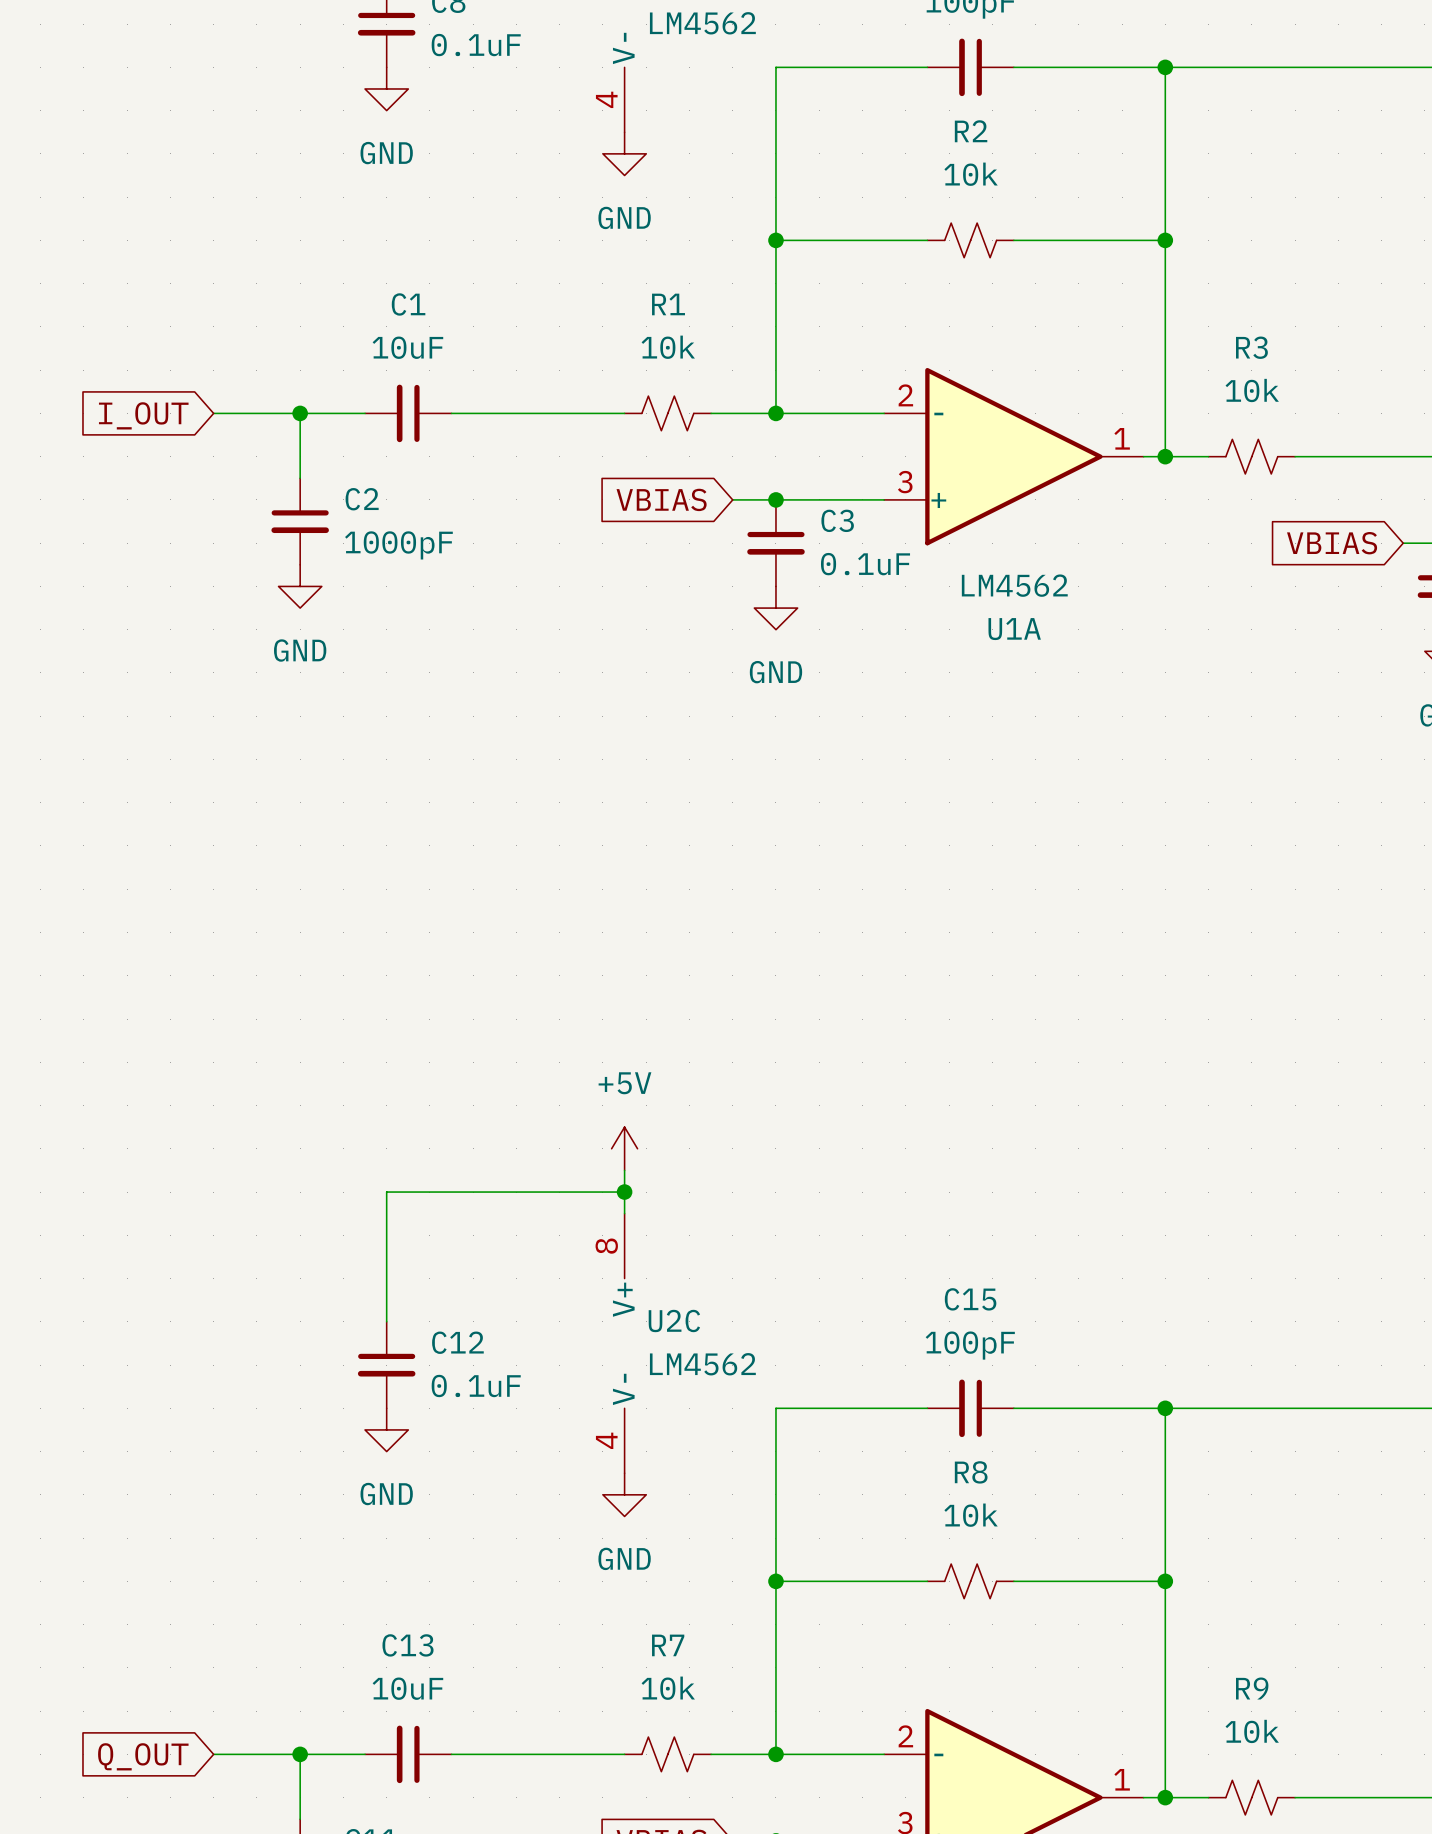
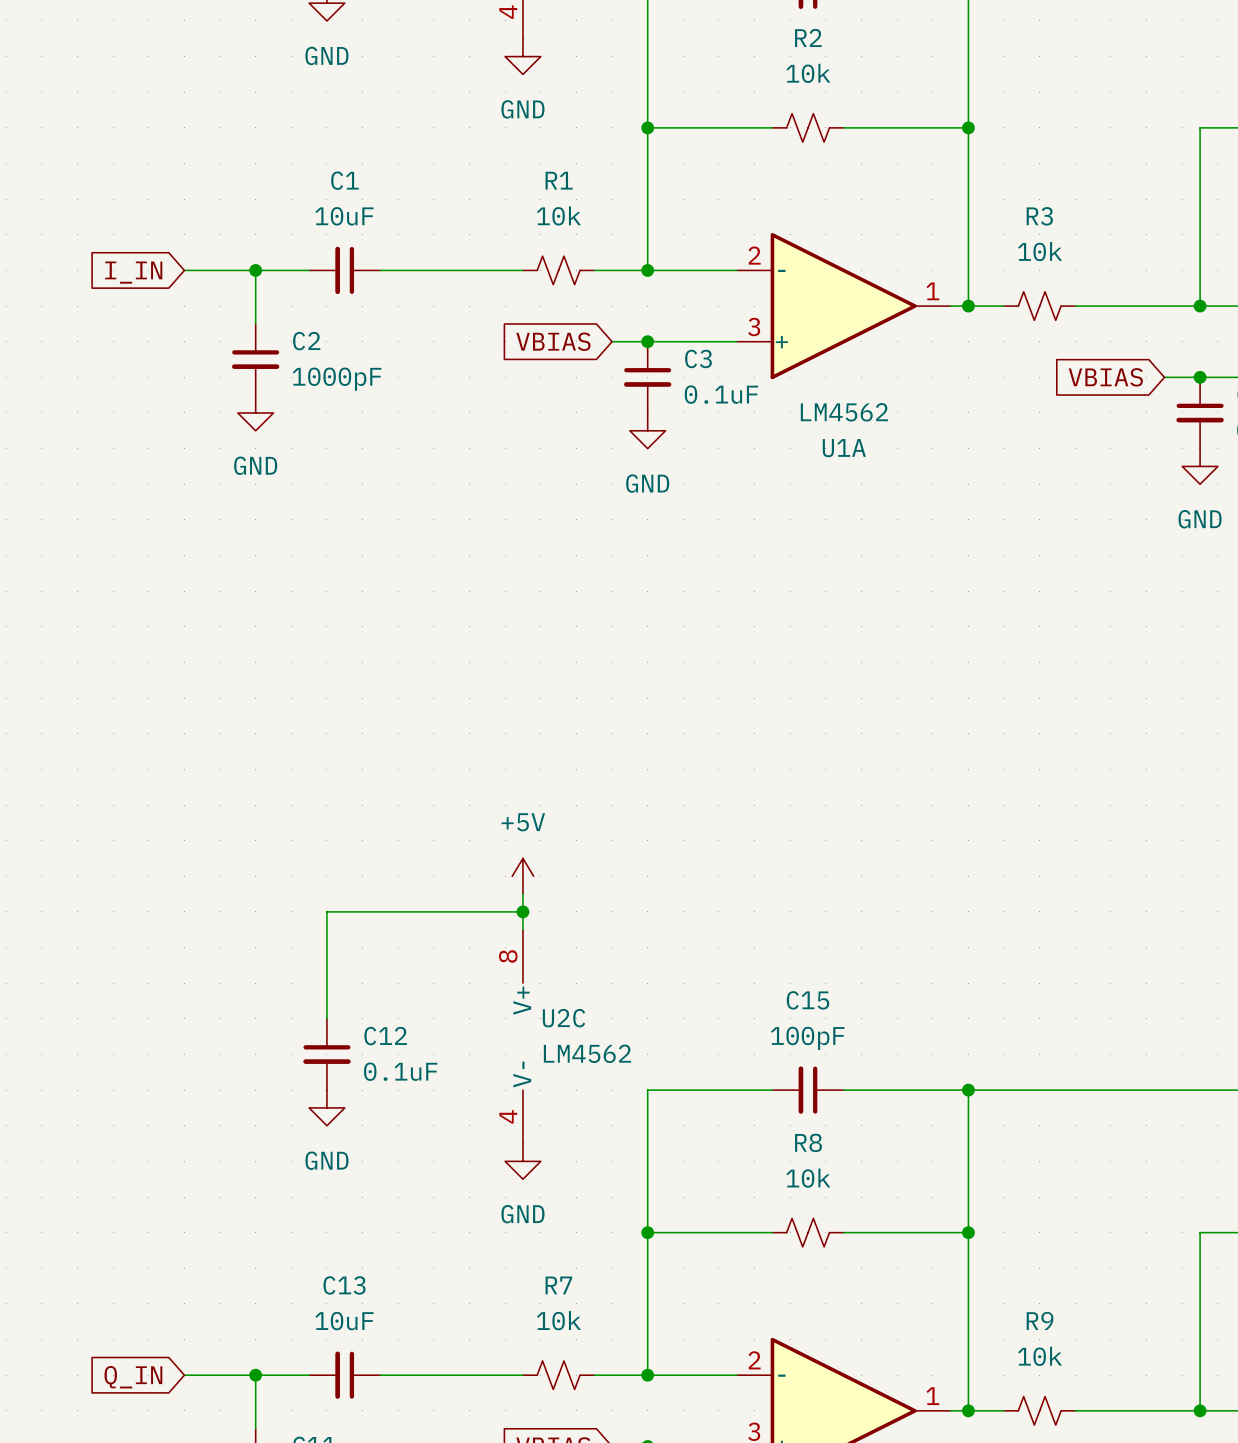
global label: I_OUT (143, 415) -> I_IN (133, 272)
global label: Q_OUT (143, 1756) -> Q_IN (133, 1377)

